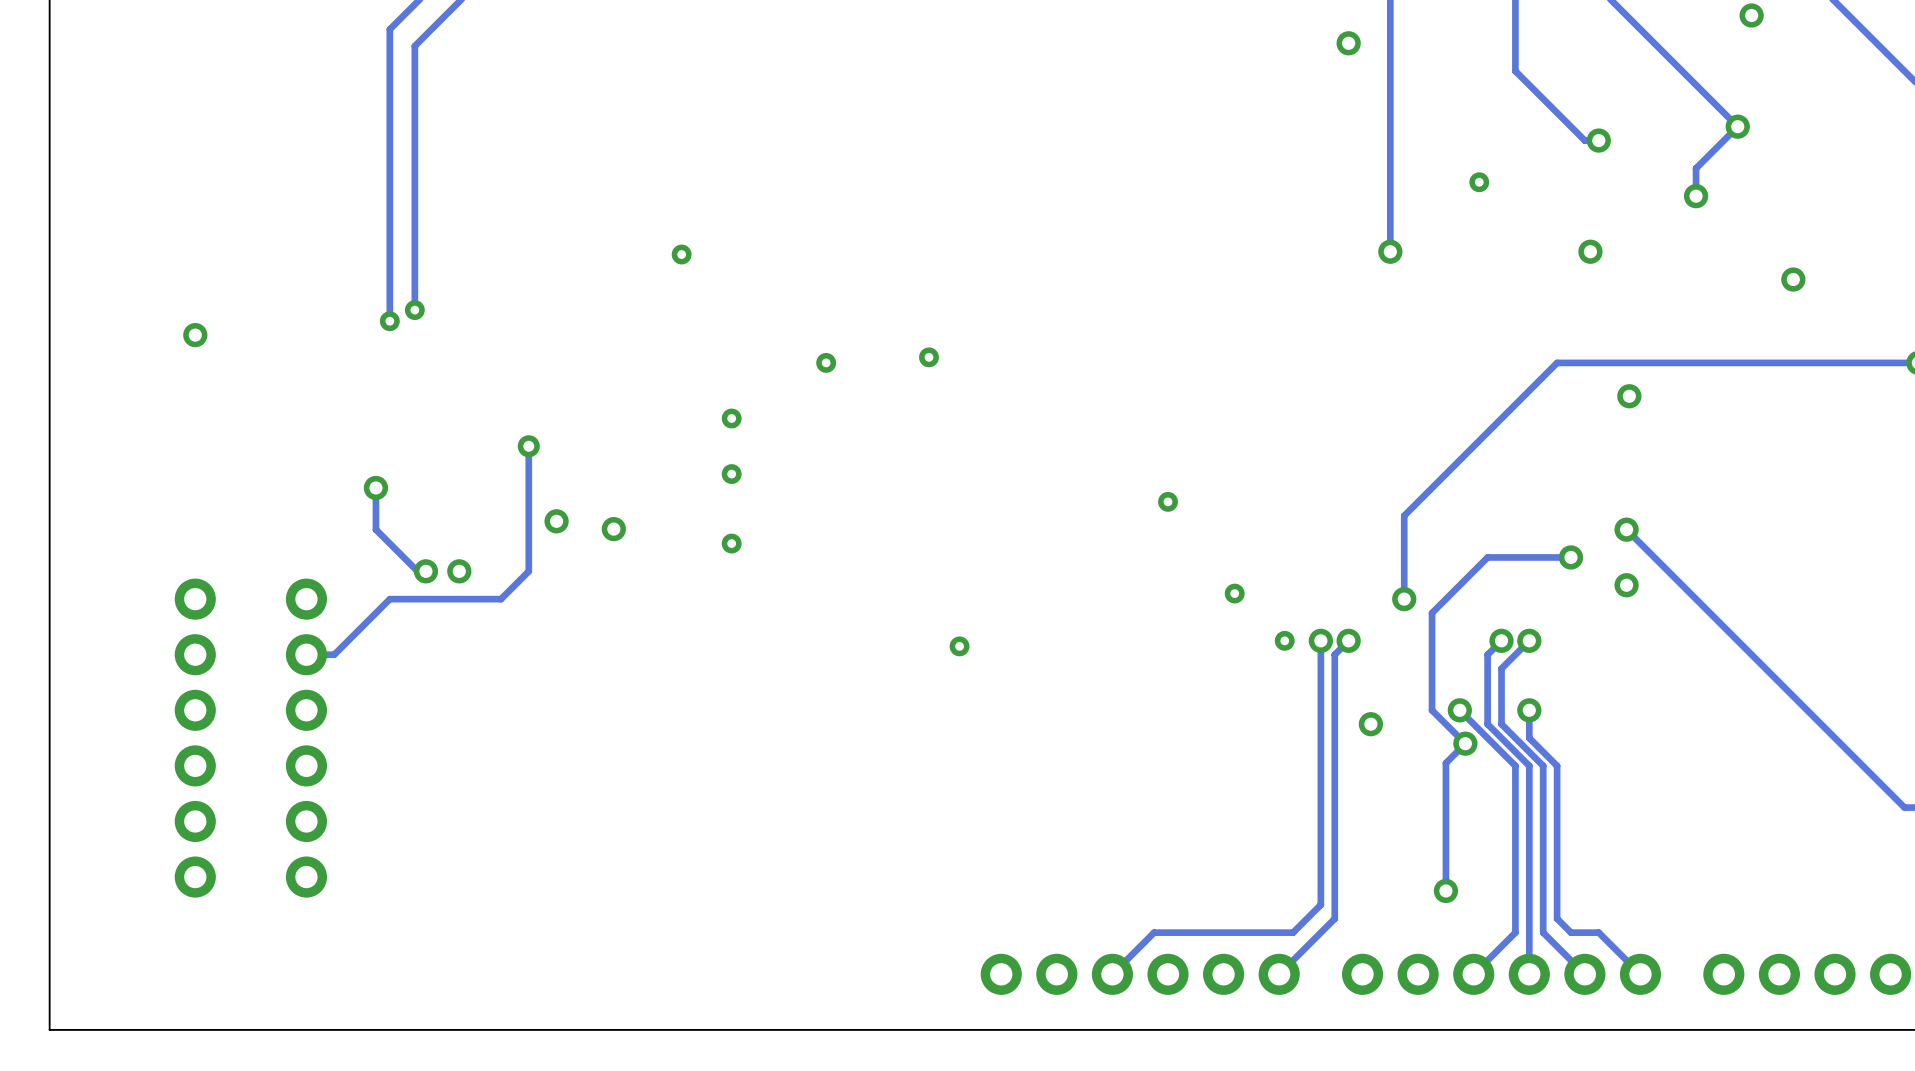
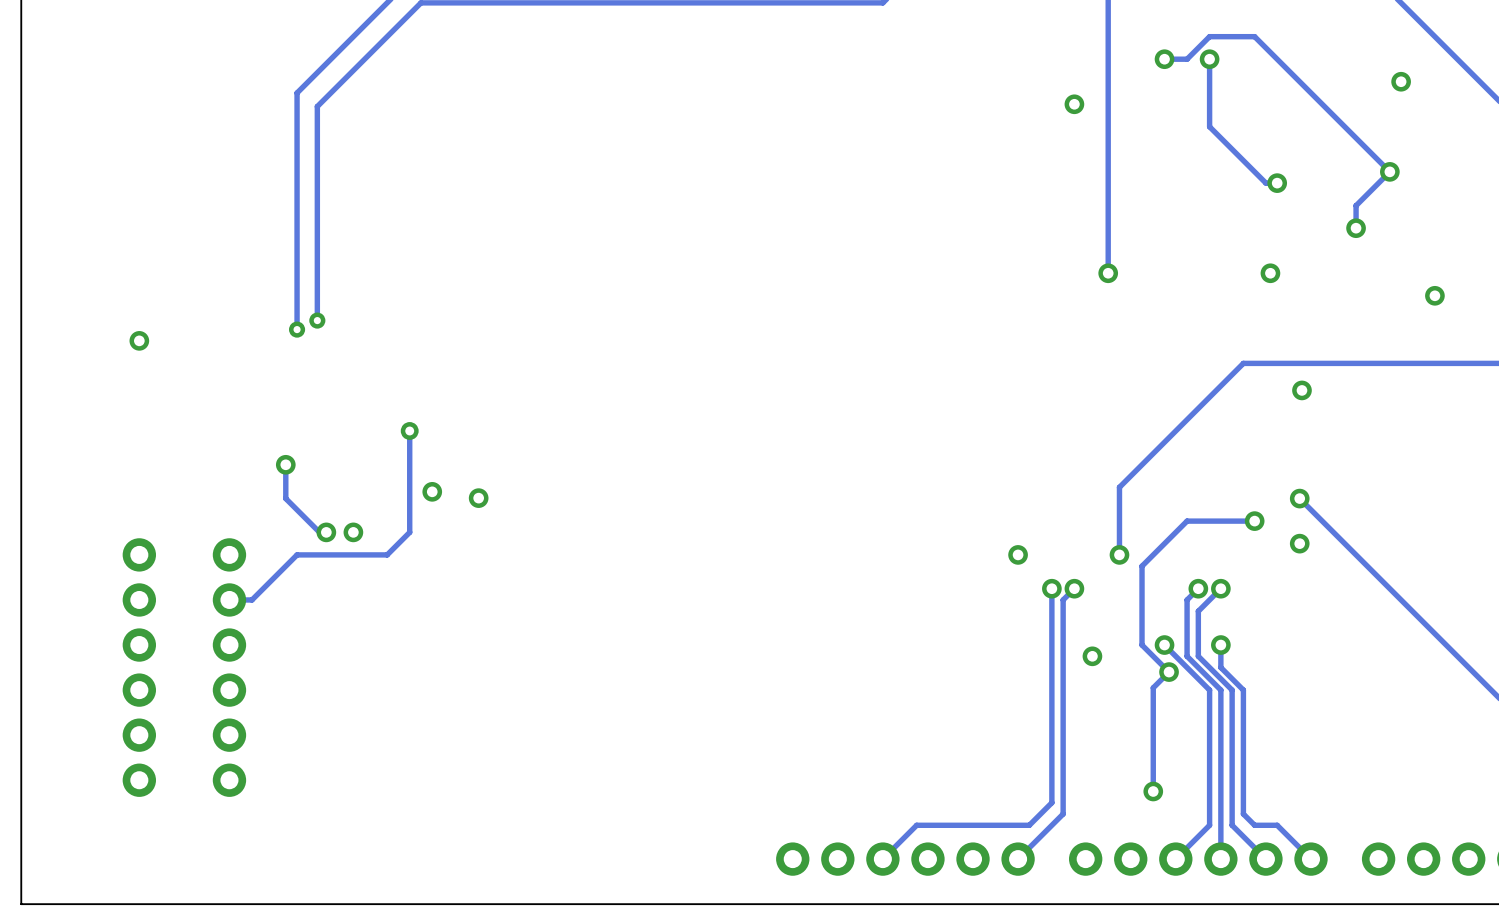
via: (1479, 182) -> none
via: (681, 254) -> none
via: (928, 357) -> none
via: (826, 362) -> none
via: (731, 418) -> none
via: (731, 474) -> none
via: (1168, 501) -> none
via: (731, 543) -> none
via: (1234, 593) -> none
via: none -> (1018, 554)
via: (1284, 640) -> none
via: (959, 646) -> none

